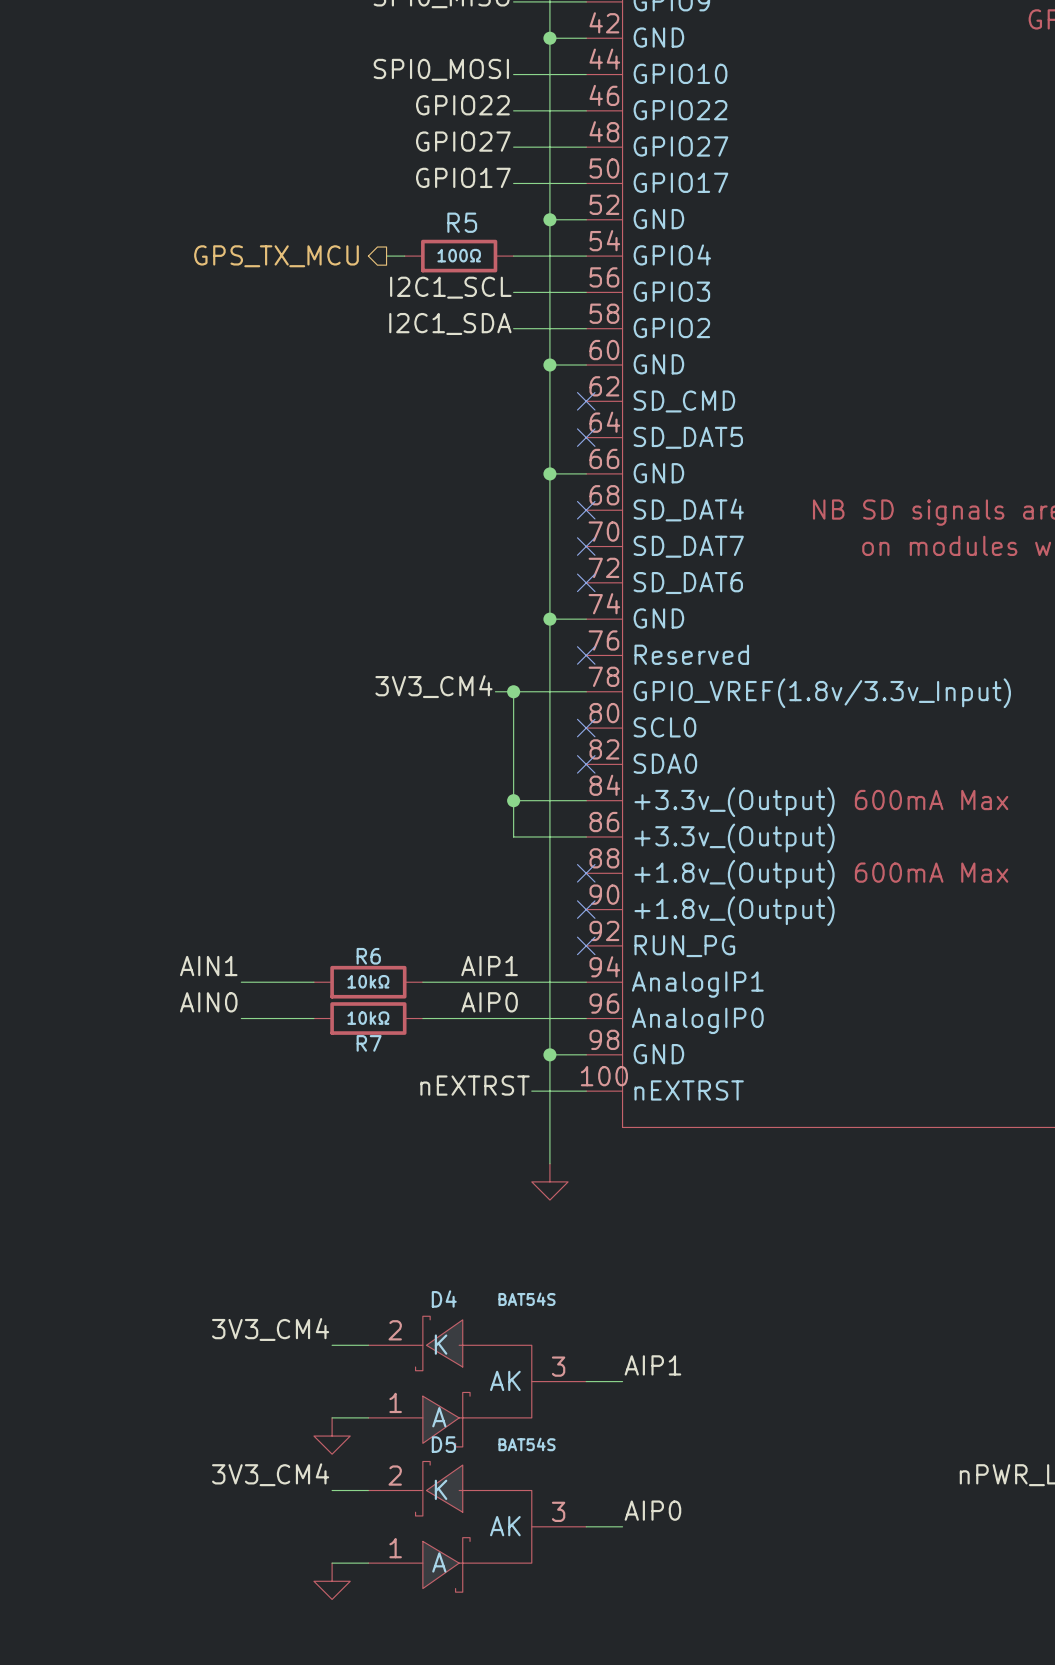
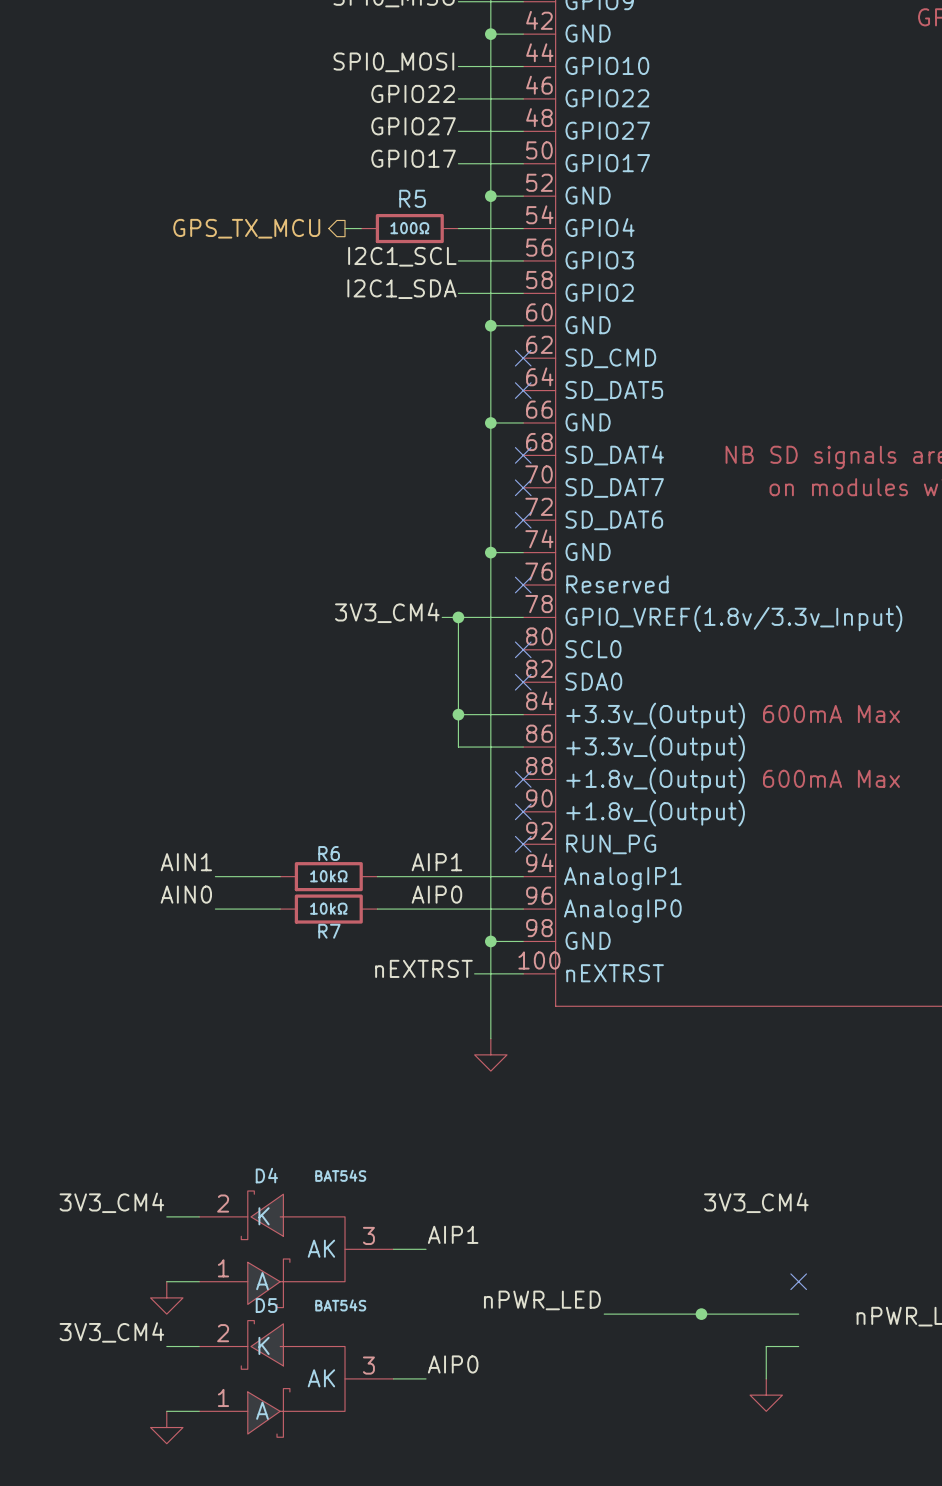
label: 3V3_CM4 (270, 1329) -> none
wire: (332, 1345) (368, 1345) -> (166, 1216) (199, 1216)
label: none -> 3V3_CM4 (111, 1202)
label: none -> 3V3_CM4 (756, 1202)
label position: AIP1 (652, 1365) -> AIP1 (453, 1234)
D4 position: (477, 1381) -> (296, 1249)
wire: (586, 1381) (622, 1381) -> (393, 1249) (426, 1249)
wire: (332, 1417) (368, 1417) -> (166, 1281) (199, 1281)
power symbol: (332, 1436) -> none
no-connect mark: none -> (798, 1281)
power symbol: none -> (166, 1297)
label: none -> nPWR_LED (542, 1300)
wire: none -> (604, 1314) (798, 1314)
junction: none -> (701, 1314)
label: 3V3_CM4 (270, 1474) -> none
wire: (332, 1490) (368, 1490) -> (166, 1346) (199, 1346)
label: none -> 3V3_CM4 (111, 1332)
wire: none -> (798, 1346) (766, 1346) (766, 1378)
label position: AIP0 (652, 1510) -> AIP0 (453, 1364)
D5 position: (477, 1526) -> (296, 1378)
wire: (586, 1526) (622, 1526) -> (393, 1378) (426, 1378)
wire: (332, 1563) (368, 1563) -> (166, 1411) (199, 1411)
power symbol: none -> (766, 1395)
power symbol: (332, 1581) -> none
power symbol: none -> (166, 1427)

